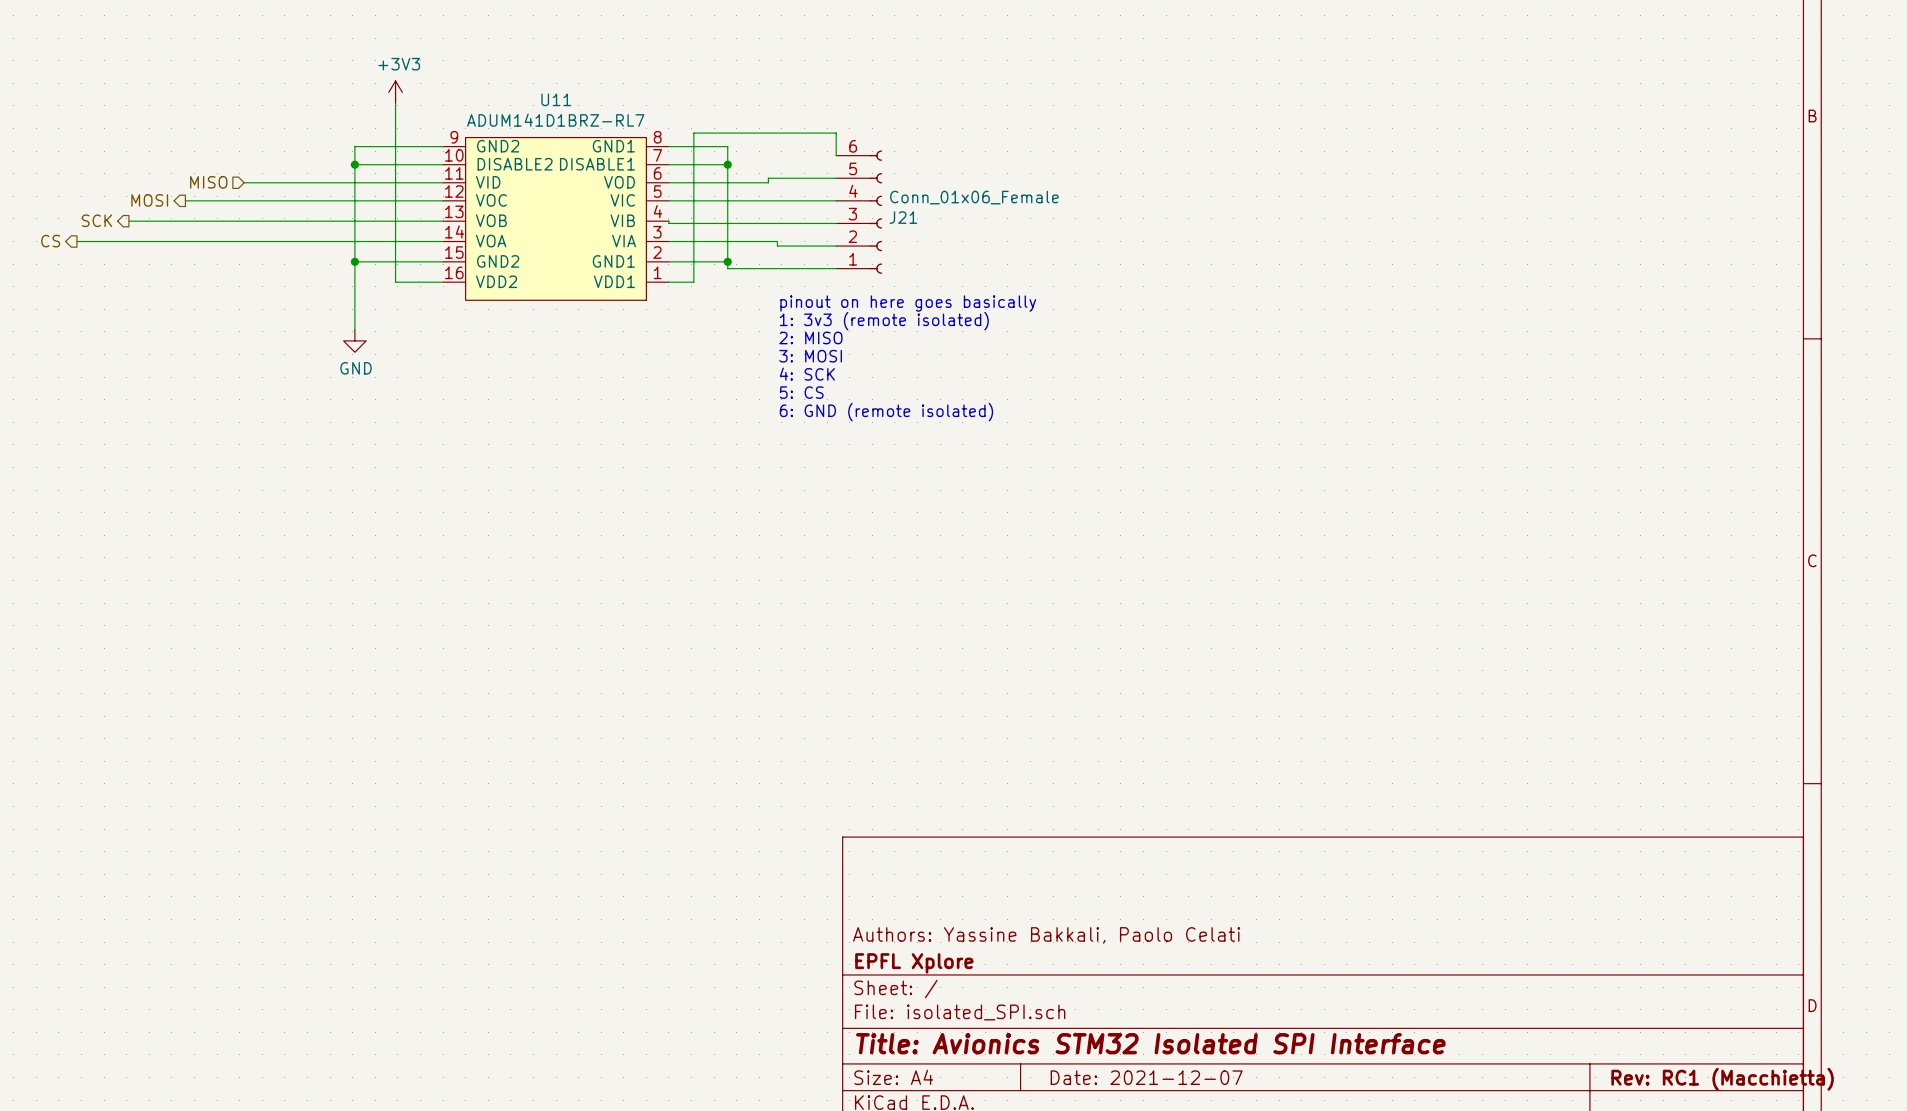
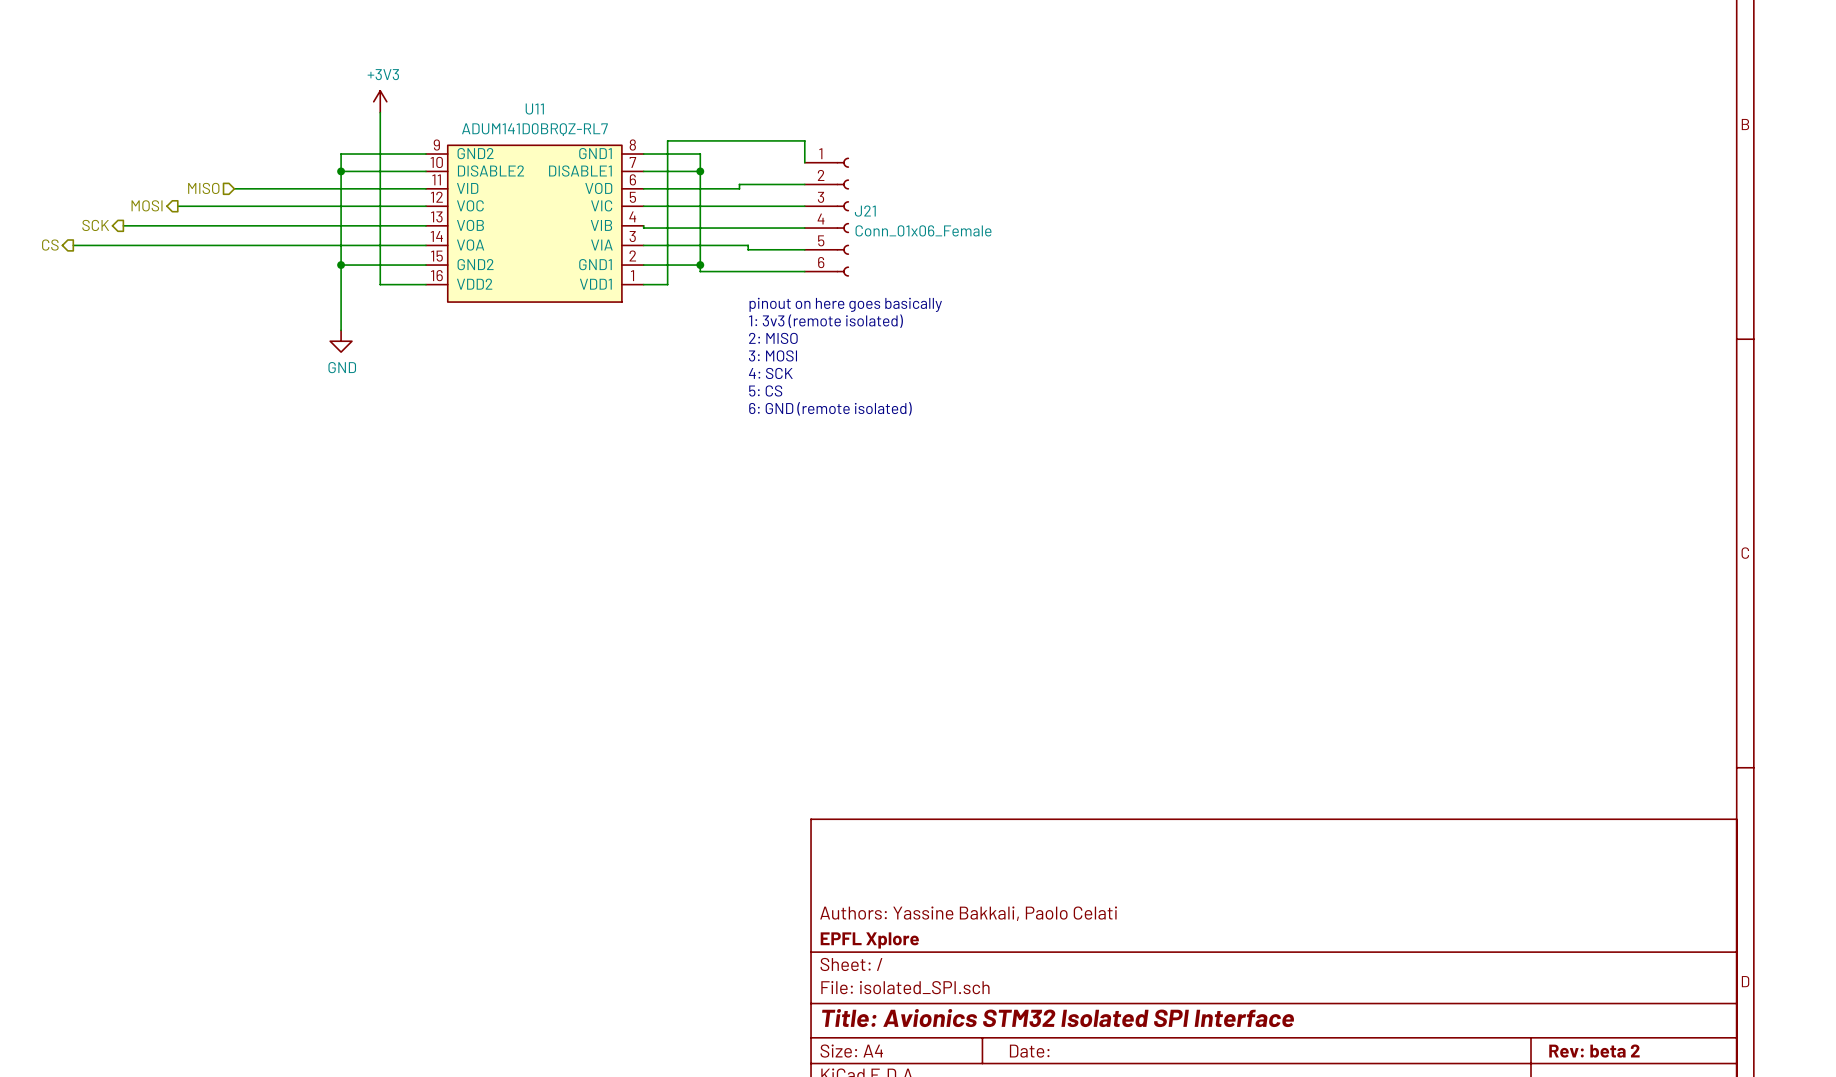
U11 value: ADUM141D1BRZ-RL7 (555, 120) -> ADUM141D0BRQZ-RL7 (534, 129)
J21 flip: as is (875, 212) -> up-down (842, 217)
title block: Date: 2021-12-07 (1146, 1077) -> Date: (1029, 1051)
title block: Rev: RC1 (Macchietta) (1722, 1079) -> Rev: beta 2 (1594, 1051)

